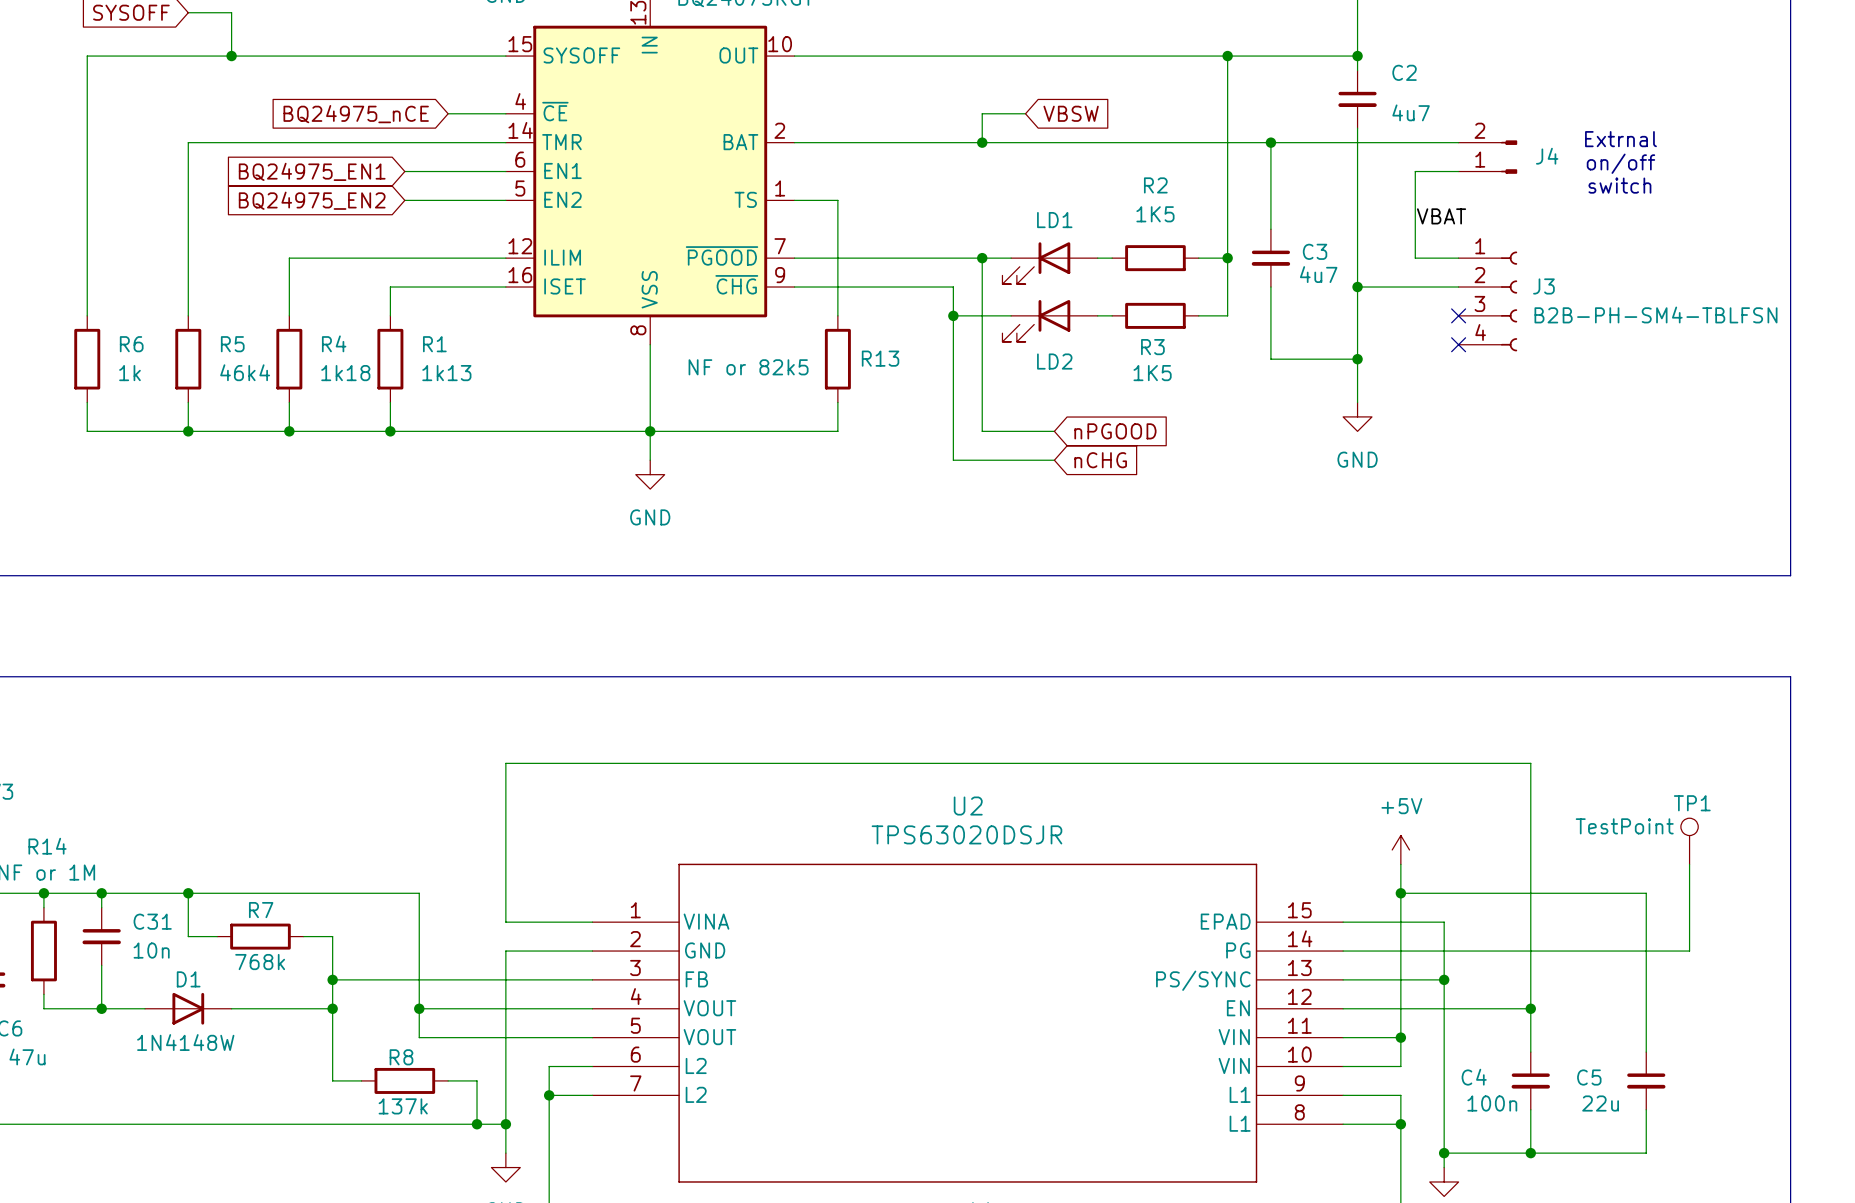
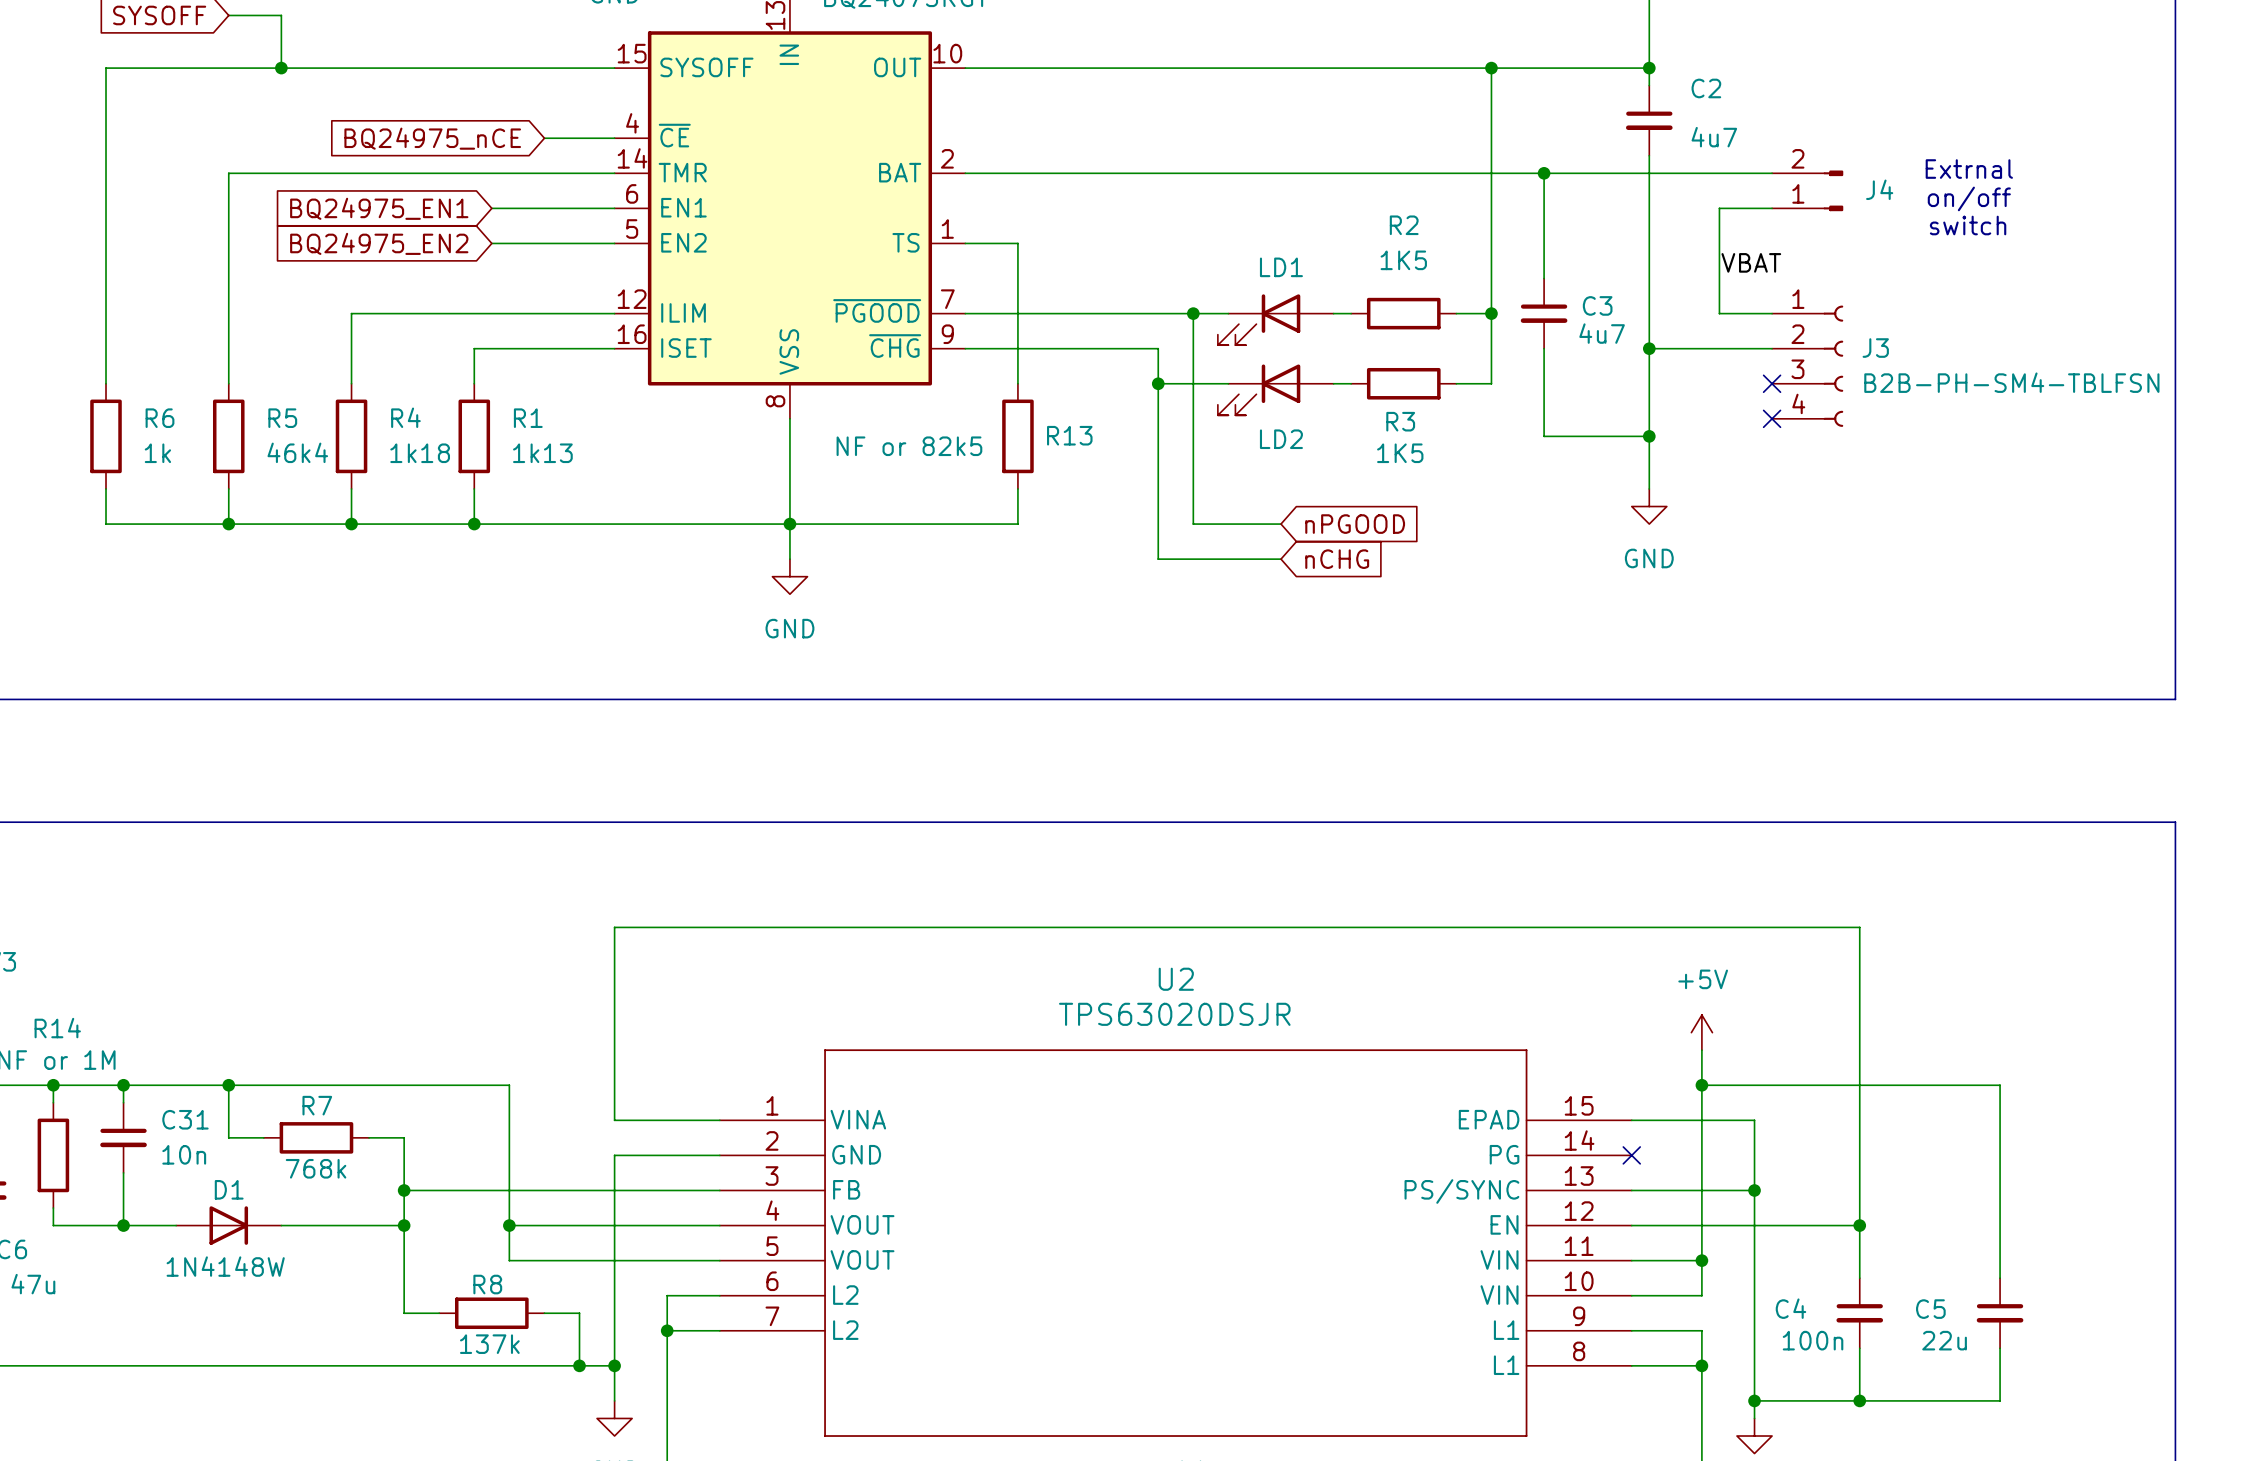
wire: (1025, 113) (982, 113) (982, 142) -> none
global label: VBSW (1071, 113) -> none
junction: (982, 142) -> none
TP1: TestPoint (1689, 841) -> none
wire: (1689, 864) (1689, 951) (1343, 951) -> none
no-connect mark: none -> (1631, 1155)

